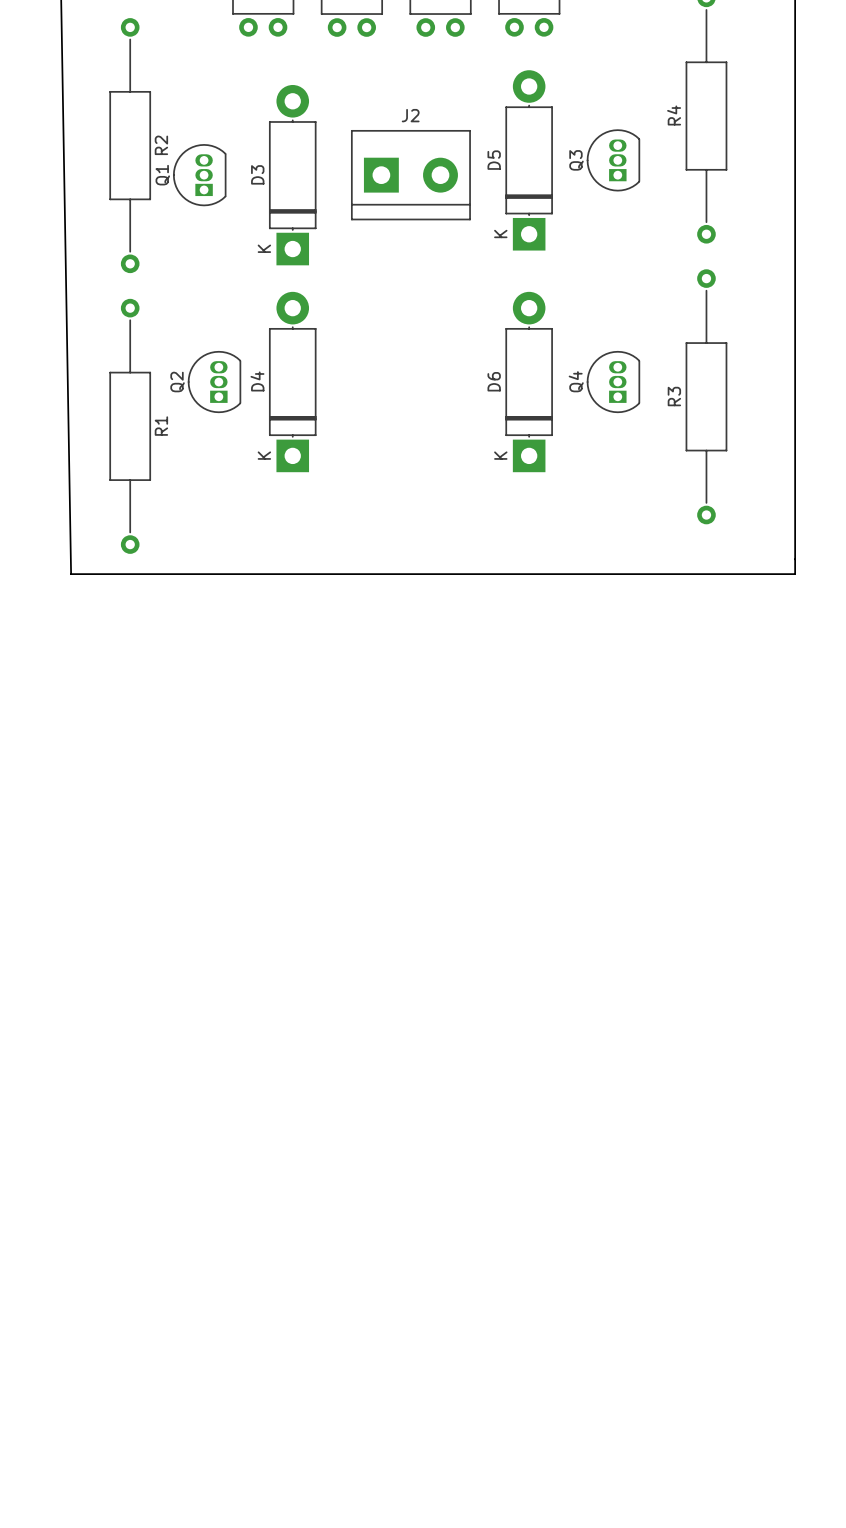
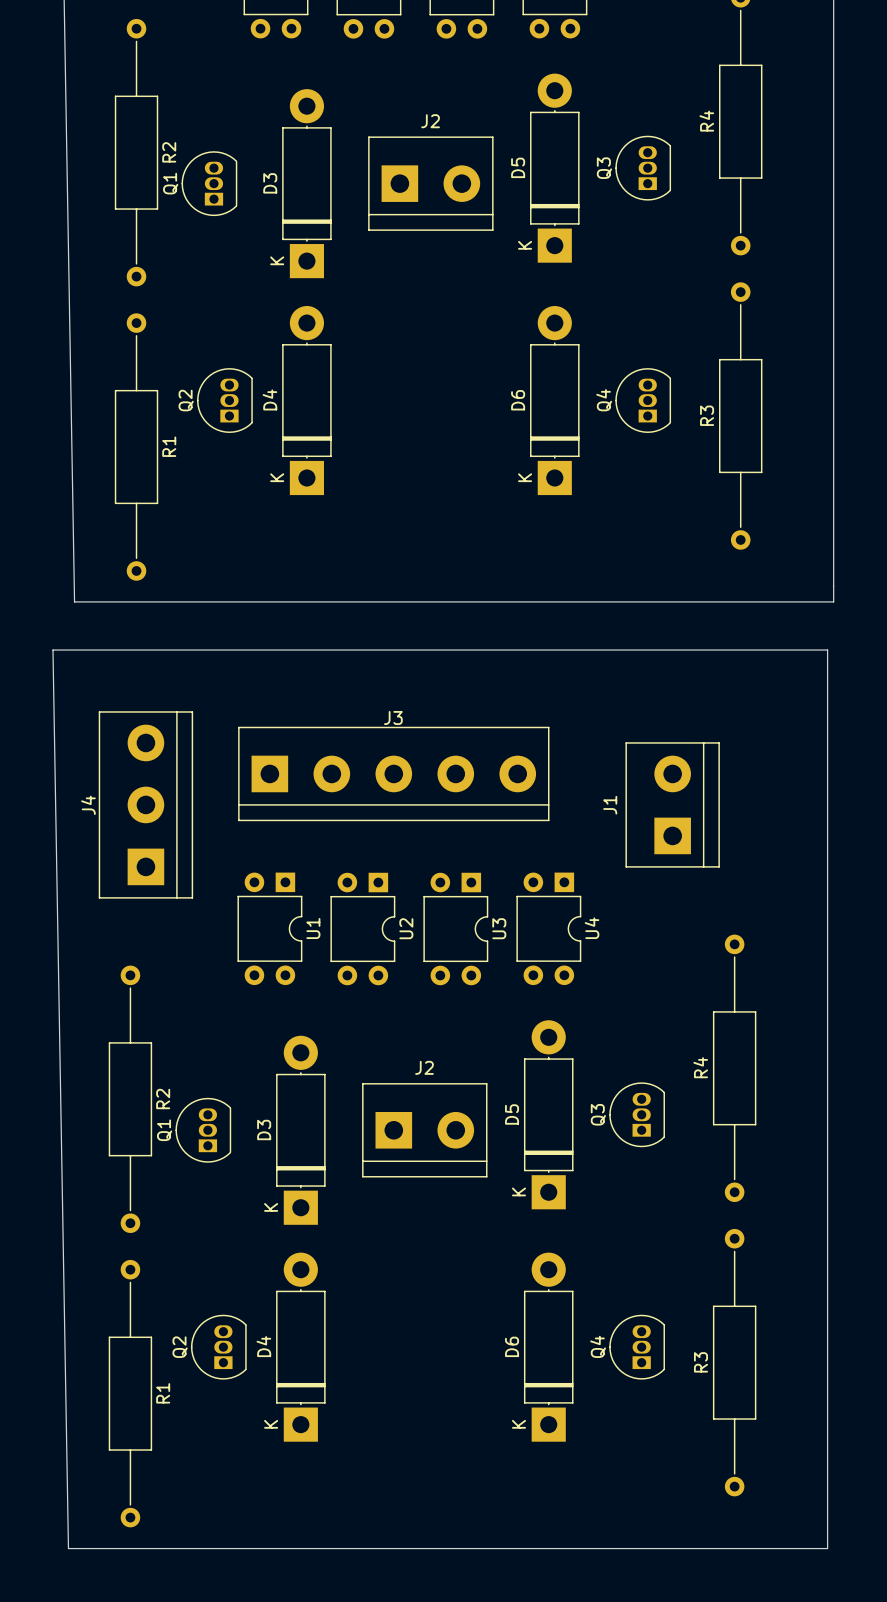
board edge: none -> (52, 650) (68, 1548) (827, 1548) (827, 650) (52, 650)
J3: none -> (393, 773)
J4: none -> (145, 804)
J1: none -> (672, 804)
U1: none -> (269, 928)
U4: none -> (548, 928)
U2: none -> (362, 929)
U3: none -> (455, 929)
R4: none -> (734, 1068)
R2: none -> (130, 1099)
D5: none -> (548, 1114)
Q3: none -> (637, 1114)
Q1: none -> (203, 1130)
D3: none -> (300, 1130)
J2: none -> (424, 1130)
Q2: none -> (218, 1347)
D4: none -> (300, 1347)
D6: none -> (548, 1347)
Q4: none -> (637, 1347)
R3: none -> (734, 1362)
R1: none -> (130, 1393)

